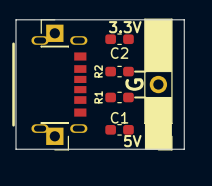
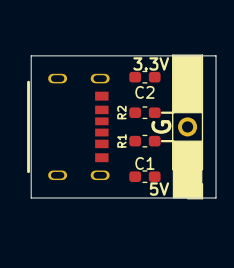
part: (54, 33) -> none
part: (54, 136) -> none

